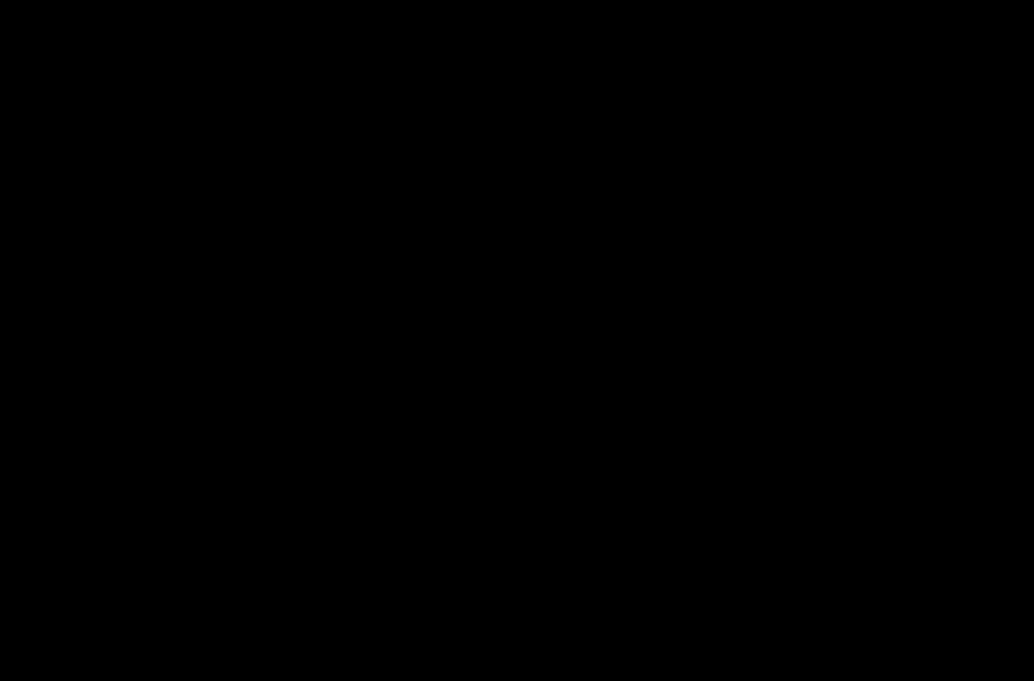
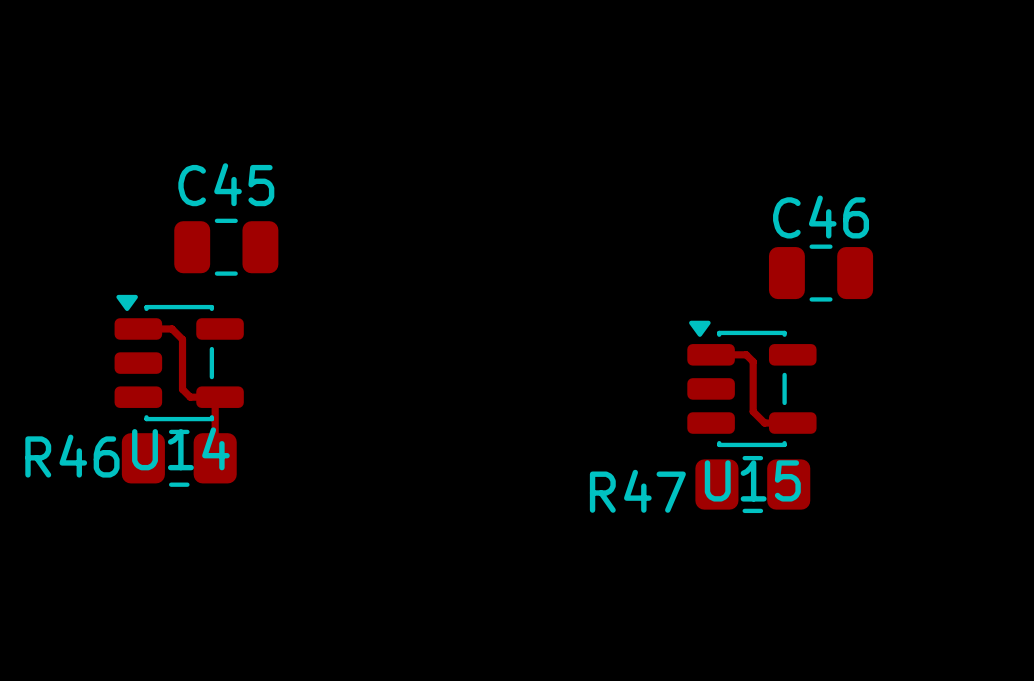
C45: none -> (226, 247)
C46: none -> (821, 273)
top track: none -> (138, 328) (172, 328) (182, 339) (182, 389) (190, 397) (220, 397) (215, 402) (215, 458)
top track: none -> (711, 354) (746, 354) (753, 361) (753, 411) (764, 423) (792, 423)
U14: none -> (179, 358)
U15: none -> (751, 383)
R46: none -> (179, 458)
R47: none -> (752, 484)

